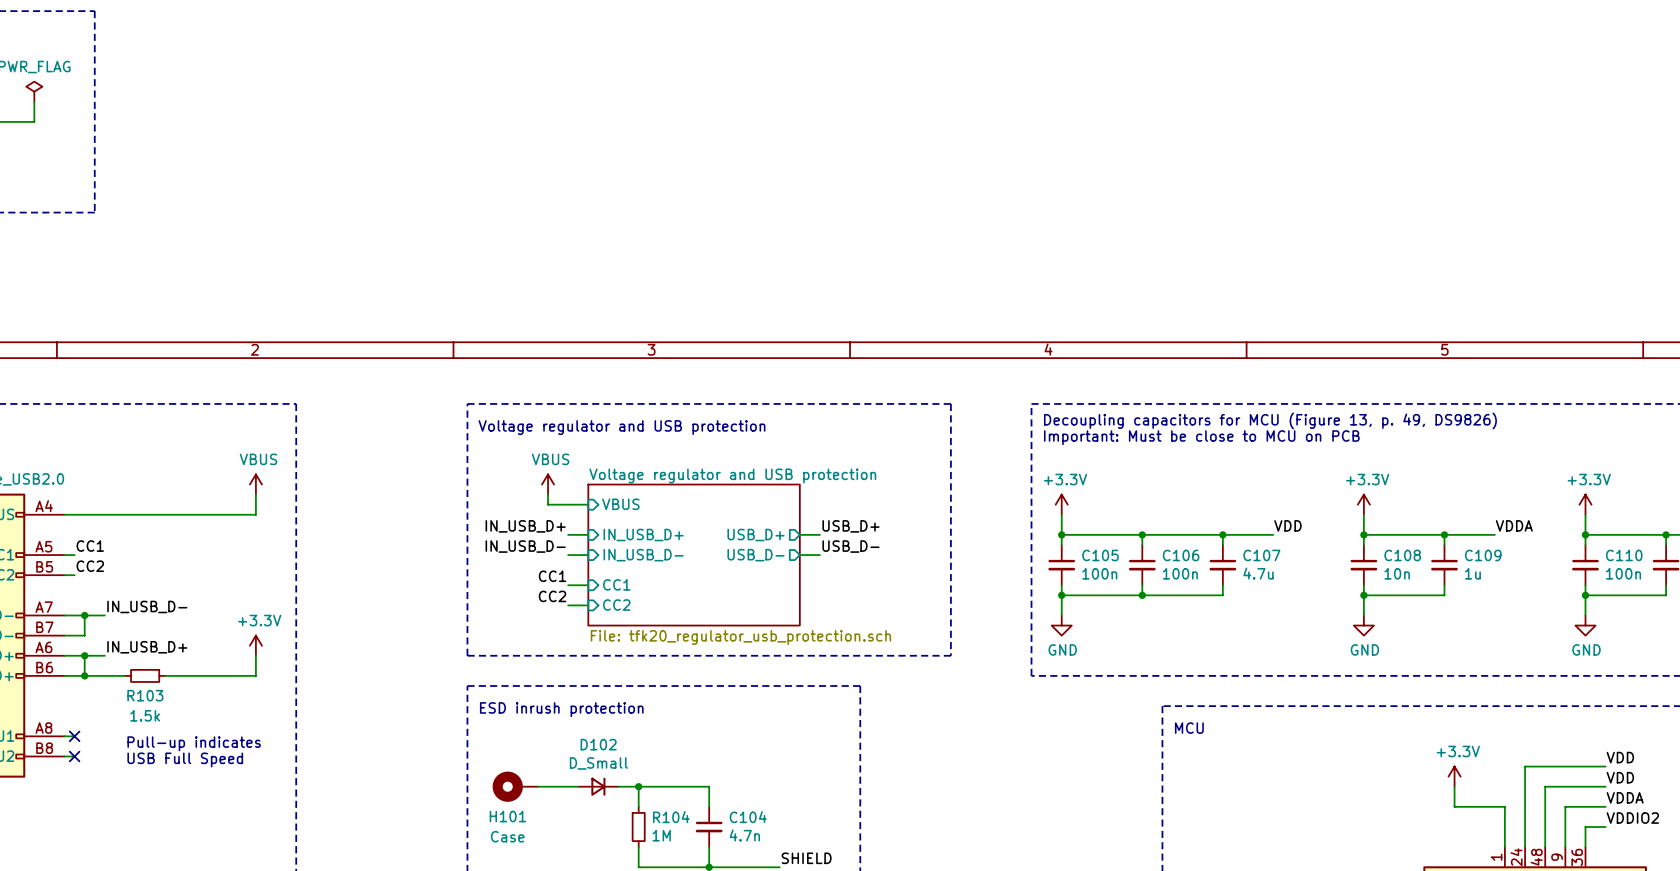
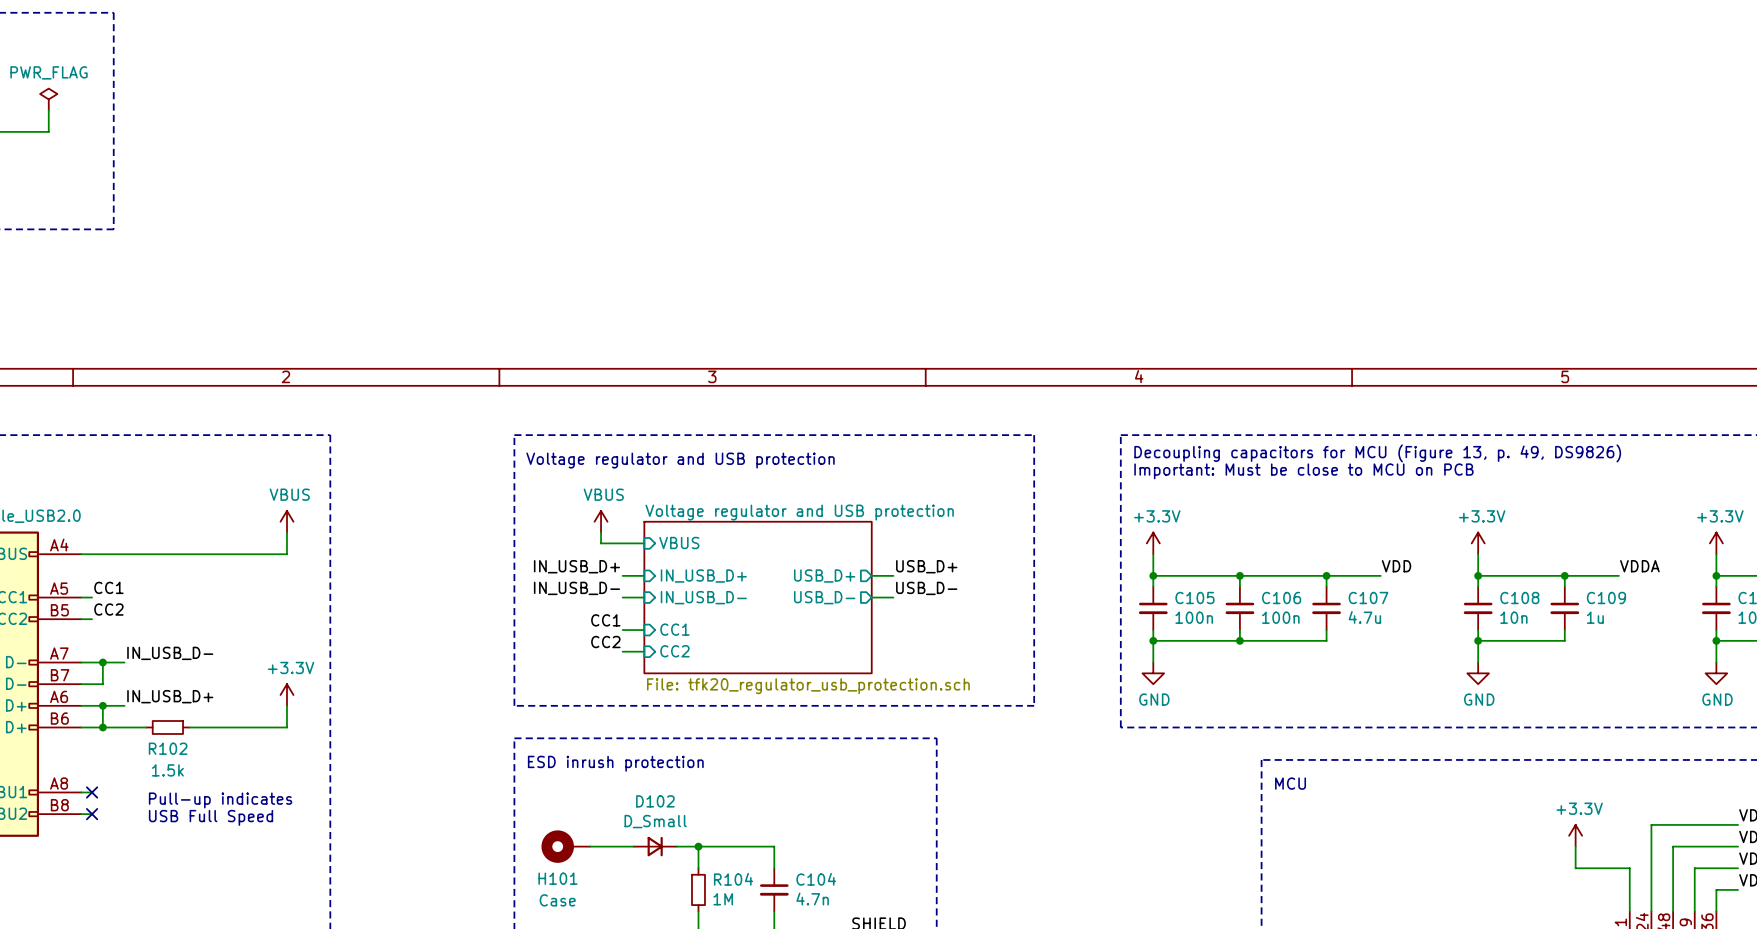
R103 name: R103 (145, 695) -> R102 (168, 748)

